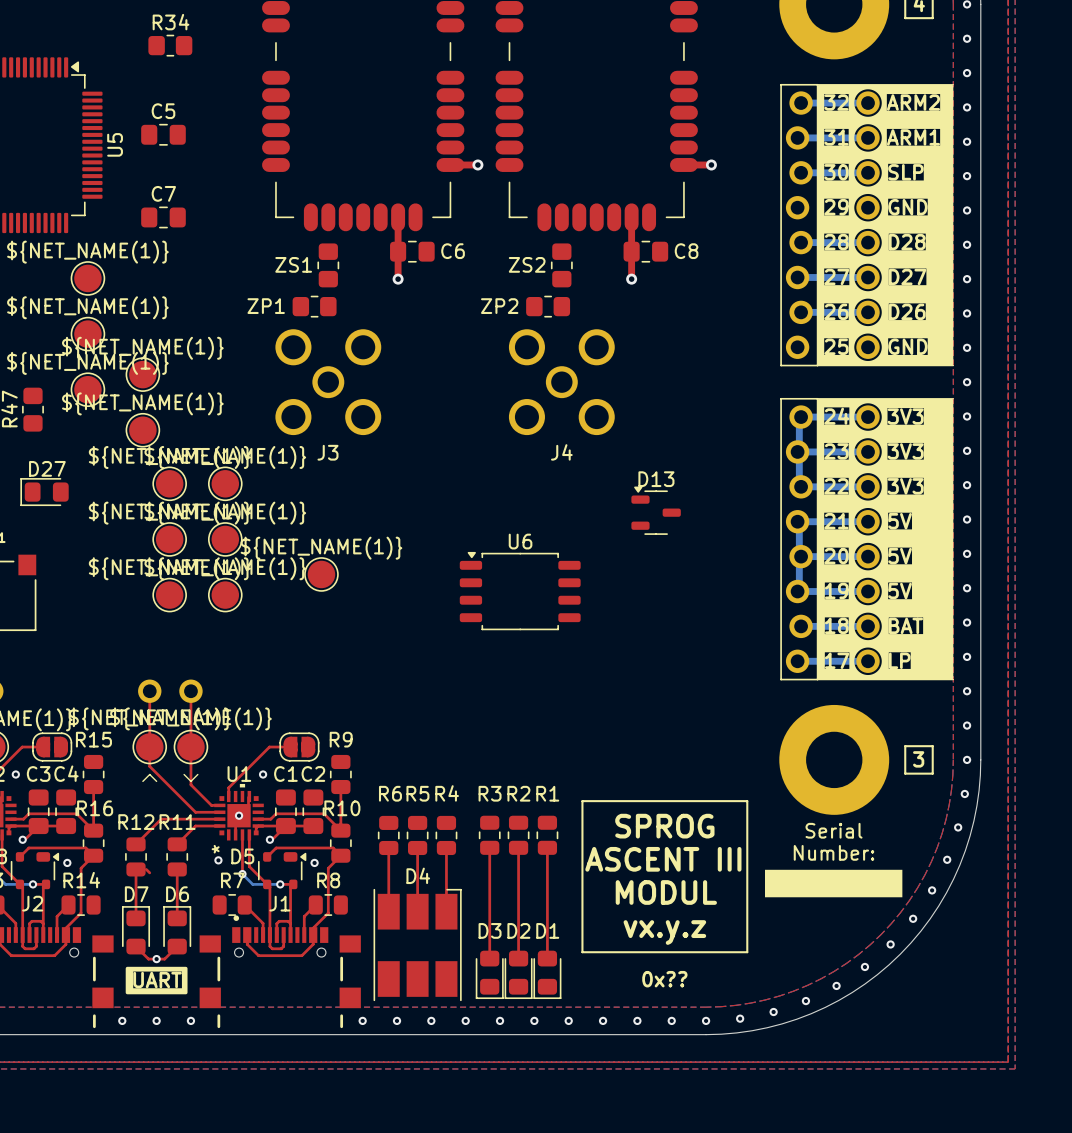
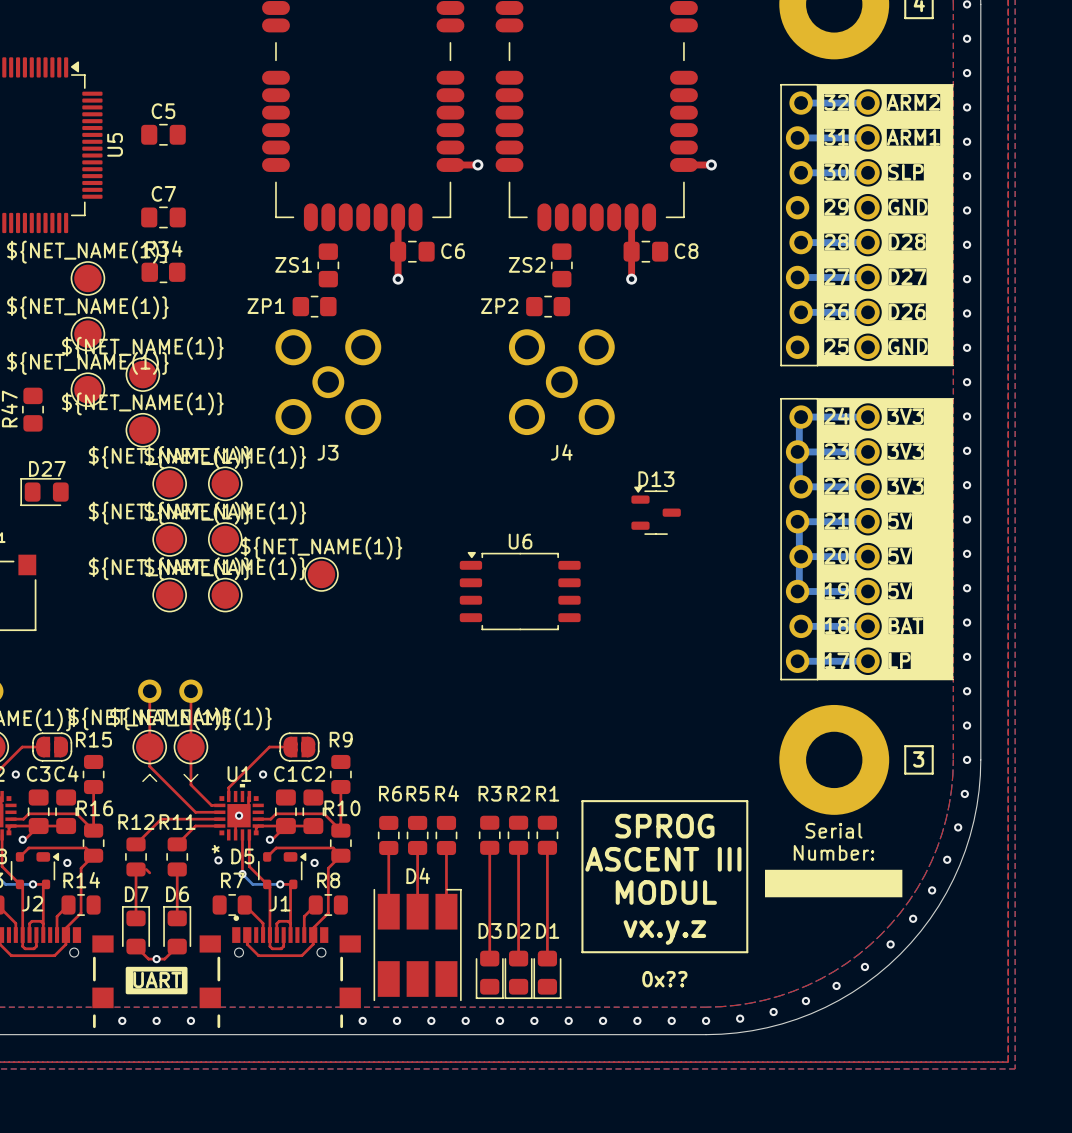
R34 position: (170, 45) -> (163, 272)

